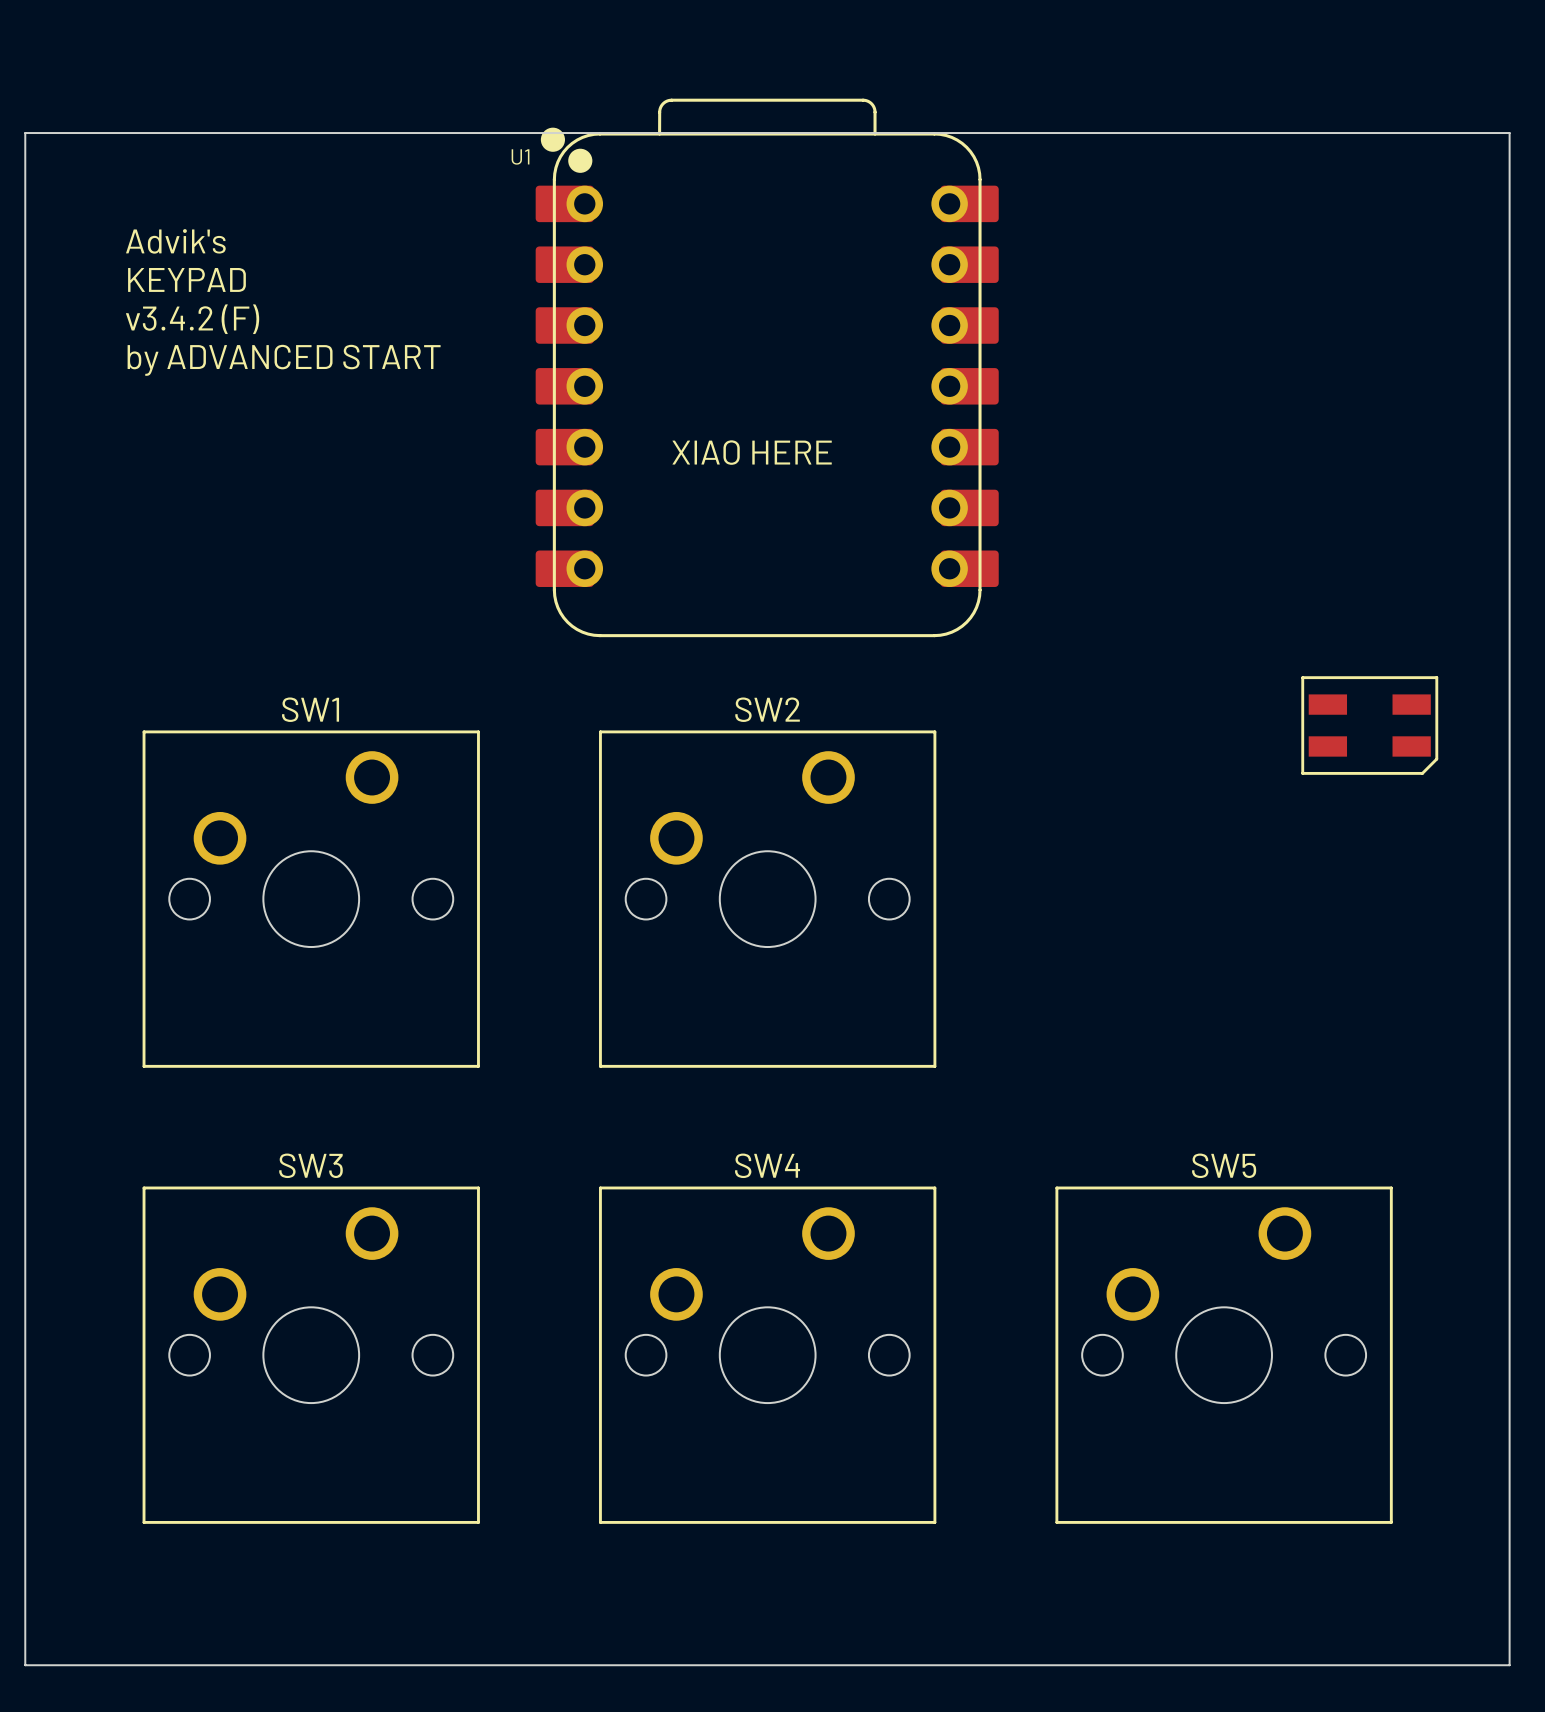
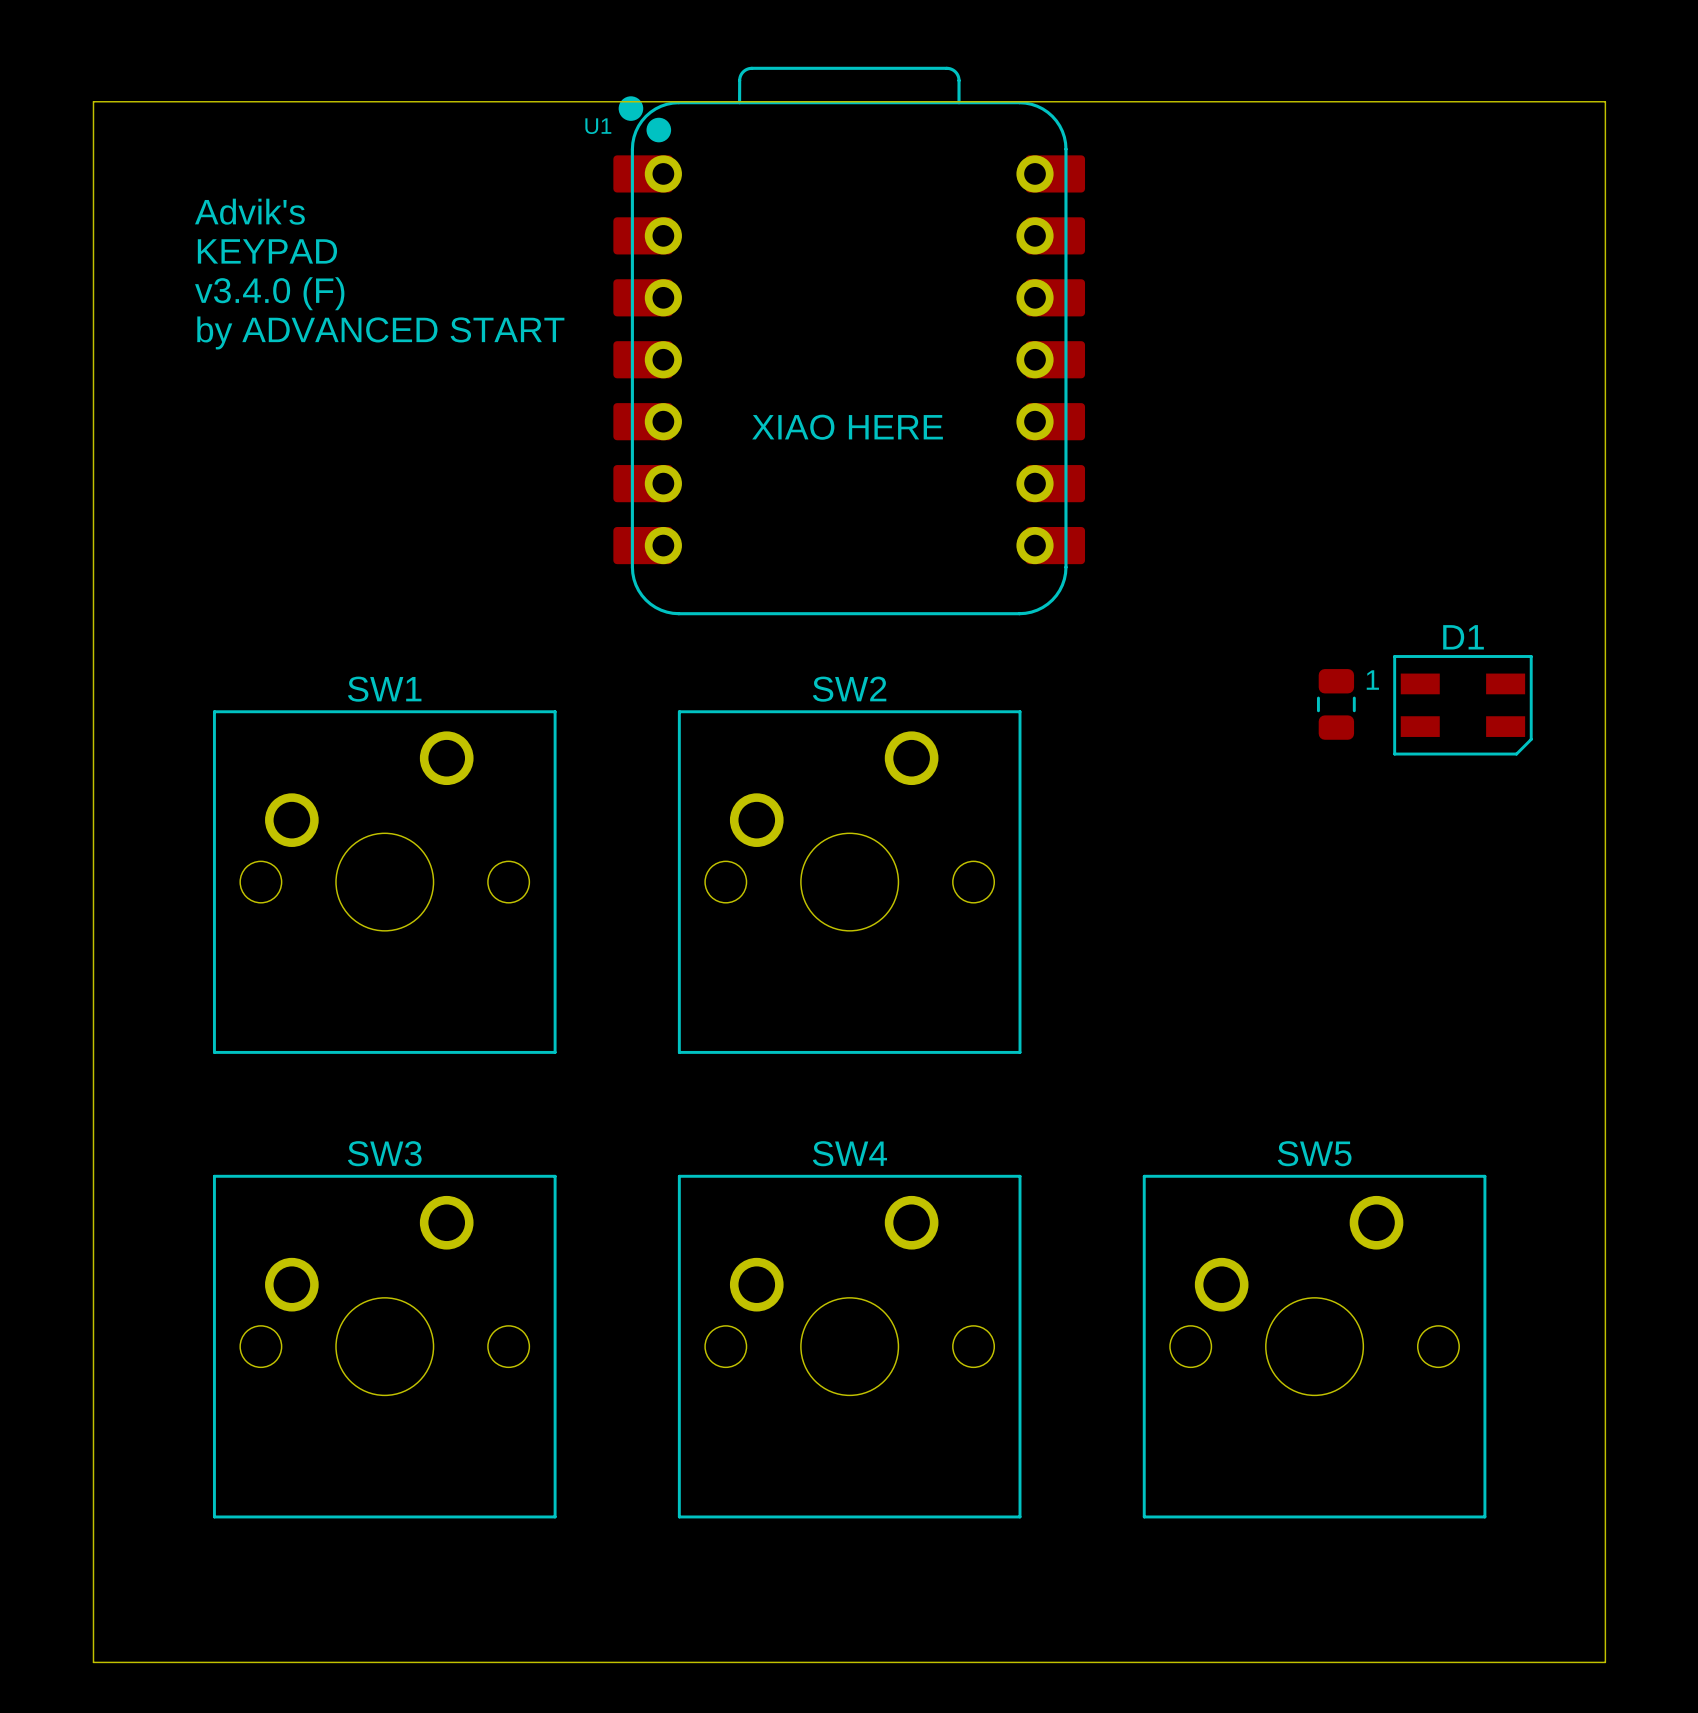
text: v3.4.2 (F) (192, 319) -> v3.4.0 (F) (269, 293)
D1 name: none -> D1 (1463, 637)
D1 text: none -> 1 (1372, 680)
part: none -> (1336, 704)

